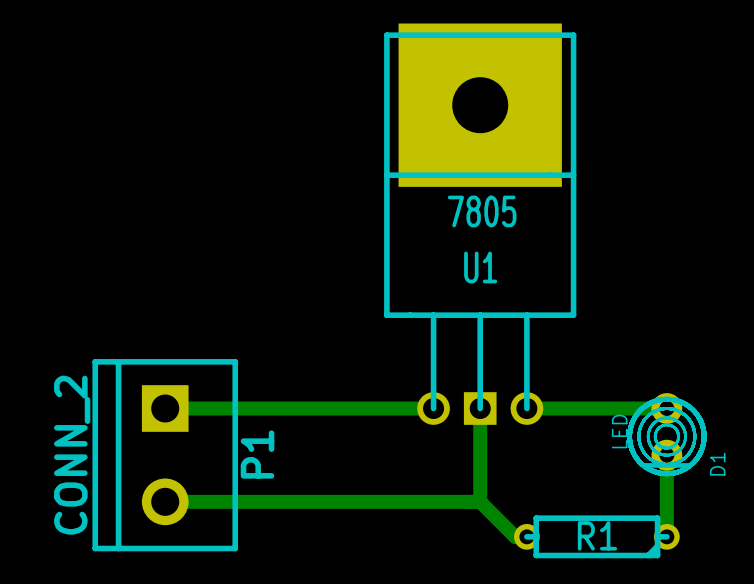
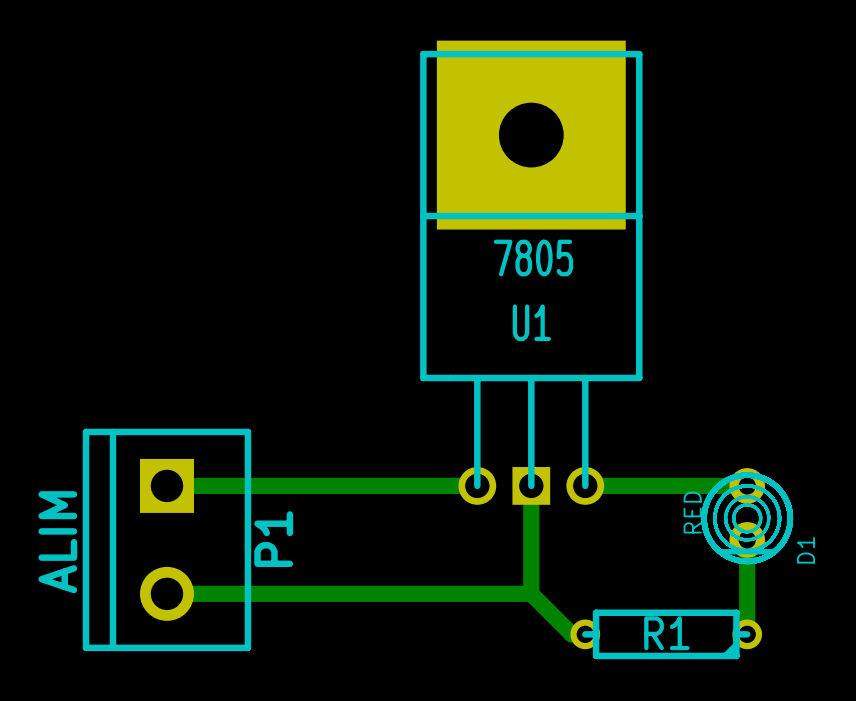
D1 value: LED (619, 431) -> RED (692, 512)
P1 value: CONN_2 (72, 455) -> ALIM (57, 542)

